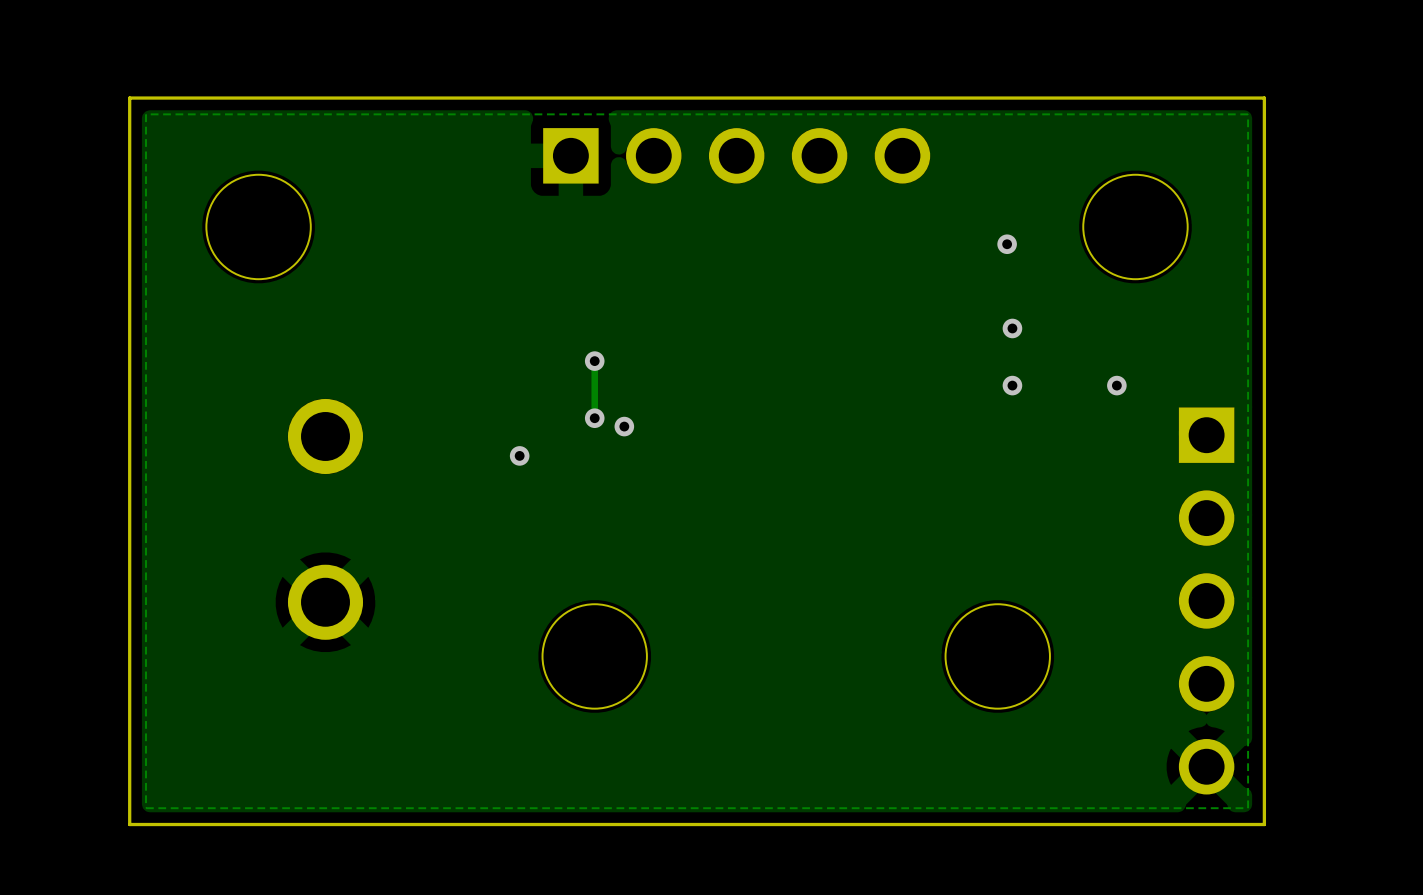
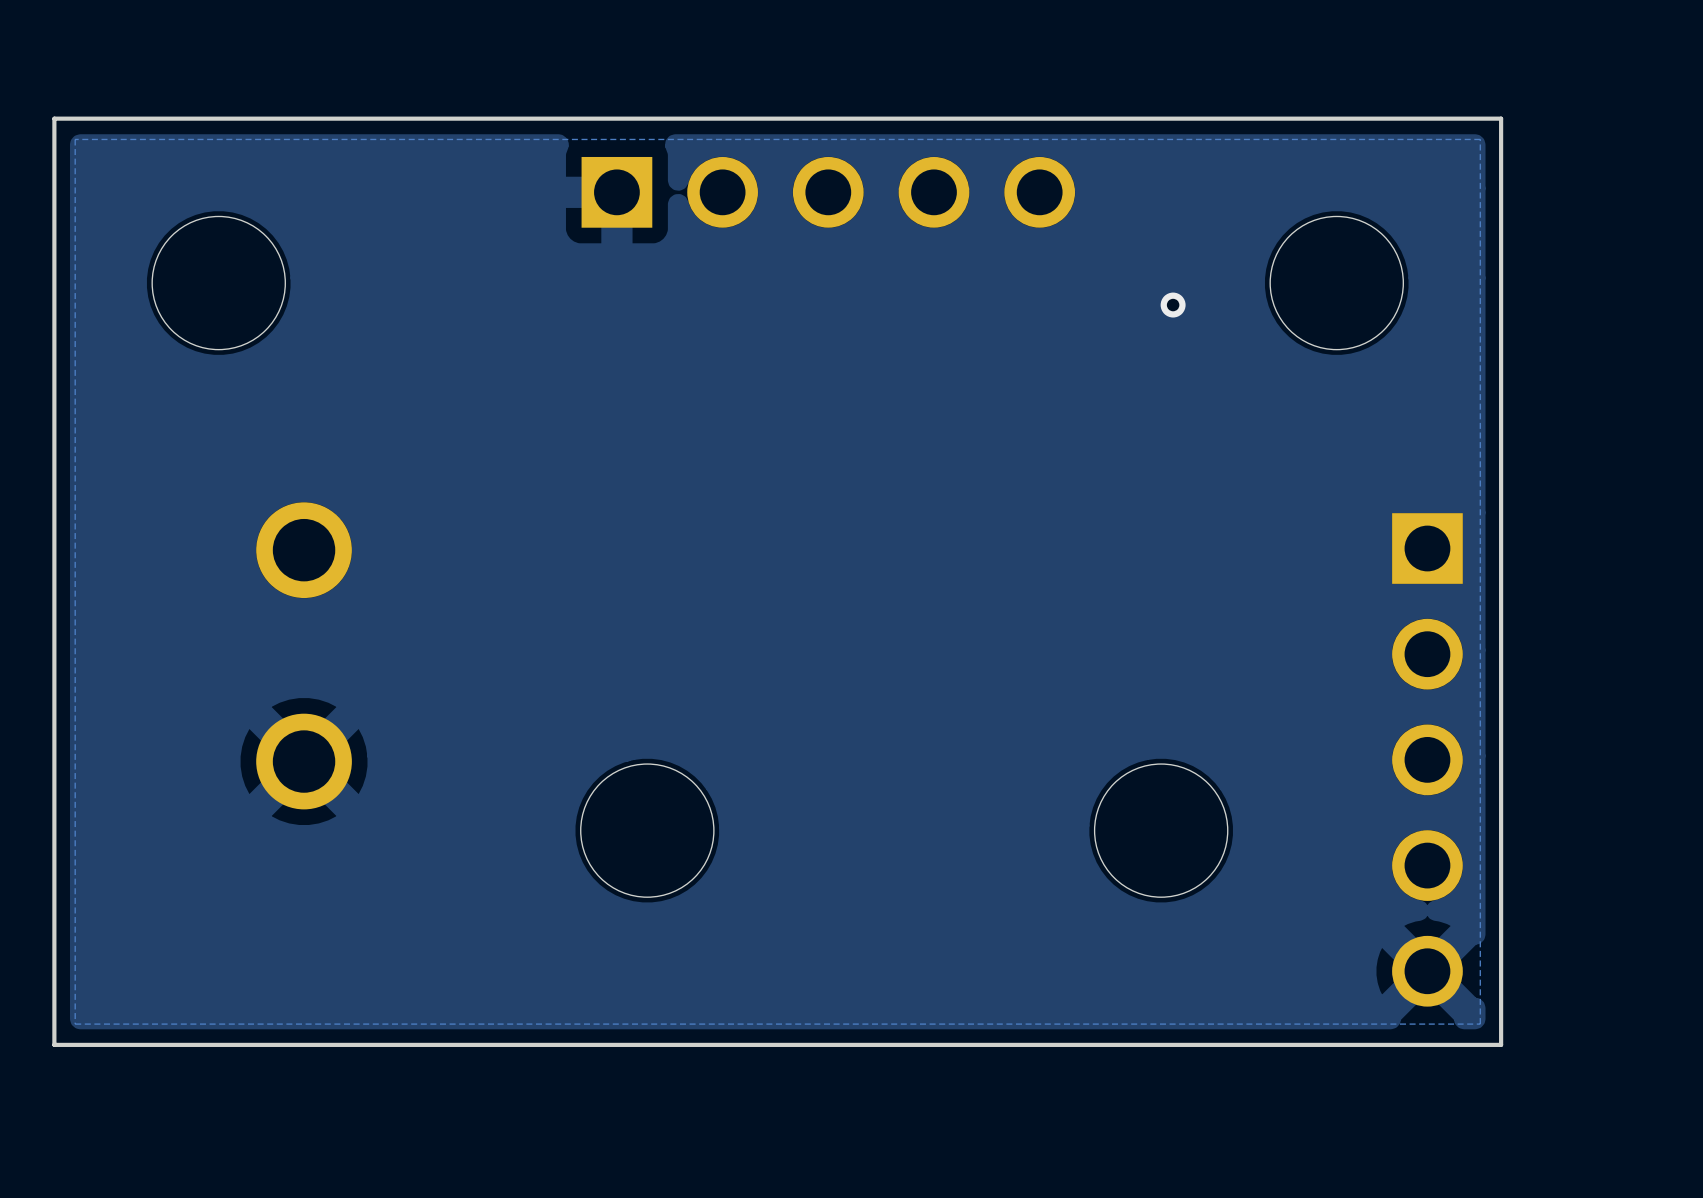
via: (1012, 328) -> none
track: (594, 361) (594, 418) -> none
via: (594, 361) -> none
via: (1012, 385) -> none
via: (1116, 385) -> none
via: (594, 418) -> none
via: (624, 426) -> none
via: (519, 455) -> none

